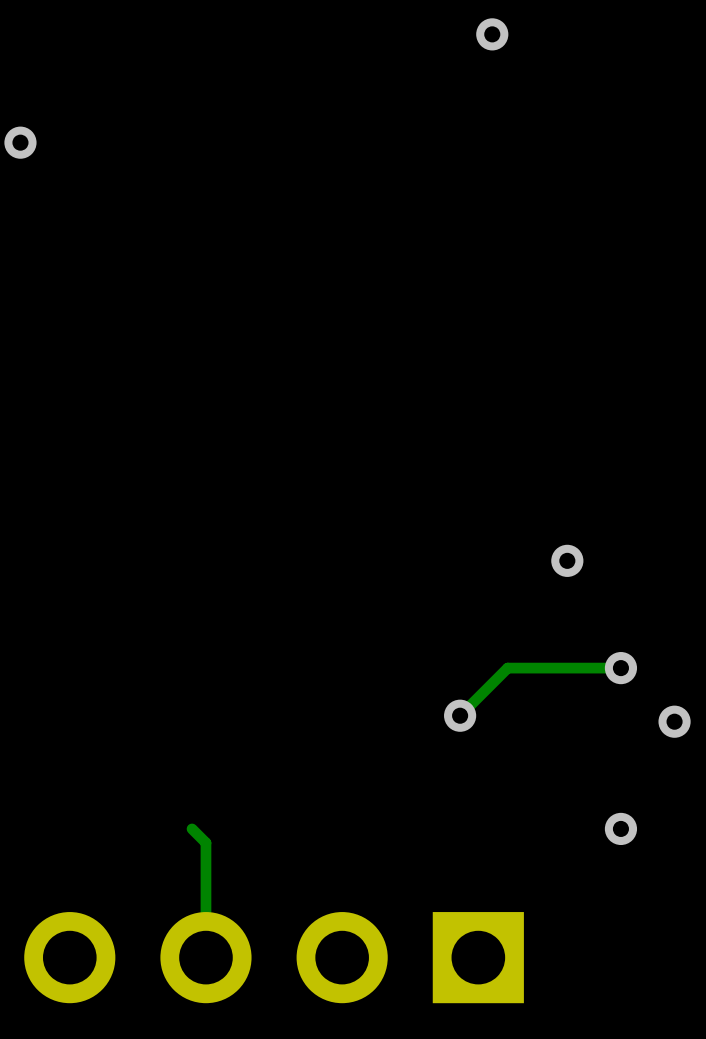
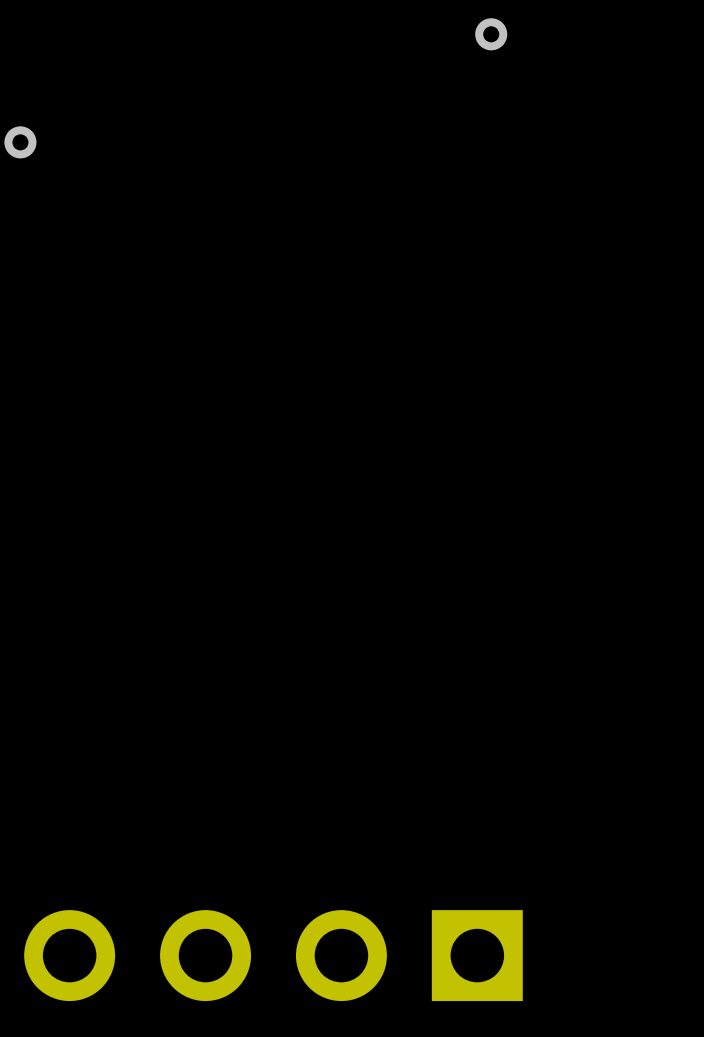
via: (567, 560) -> none
track: (620, 668) (507, 668) (460, 715) -> none
via: (620, 668) -> none
via: (460, 715) -> none
via: (674, 721) -> none
track: (192, 828) (205, 842) (205, 957) -> none
via: (620, 828) -> none

